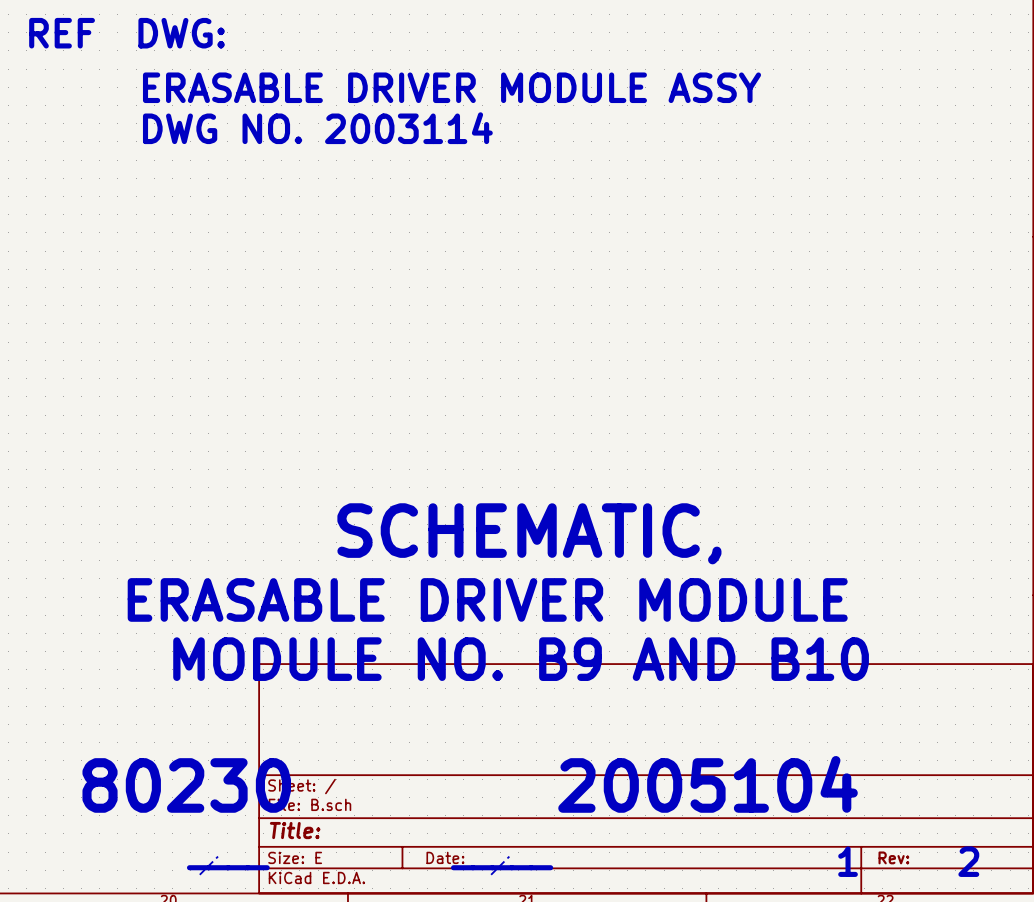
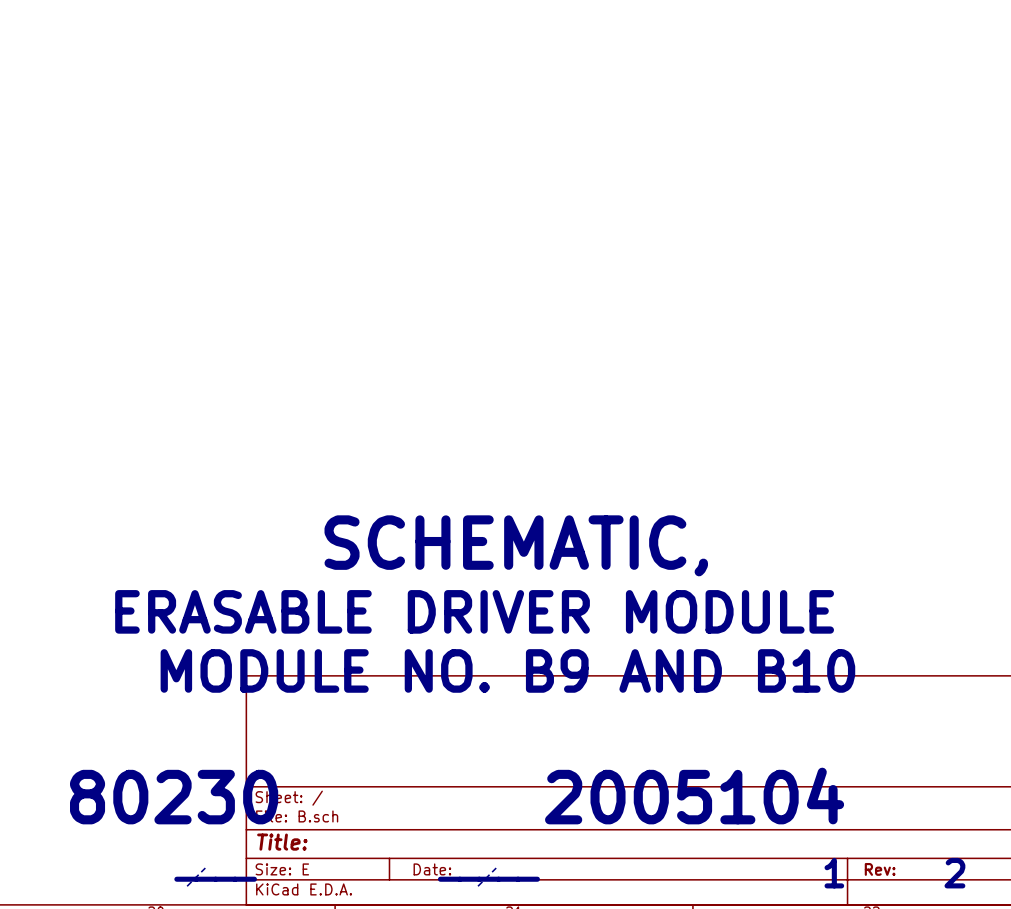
text: REF DWG: (126, 33) -> none
text: ERASABLE DRIVER MODULE ASSY (452, 87) -> none
text: DWG NO. 2003114 (317, 128) -> none

